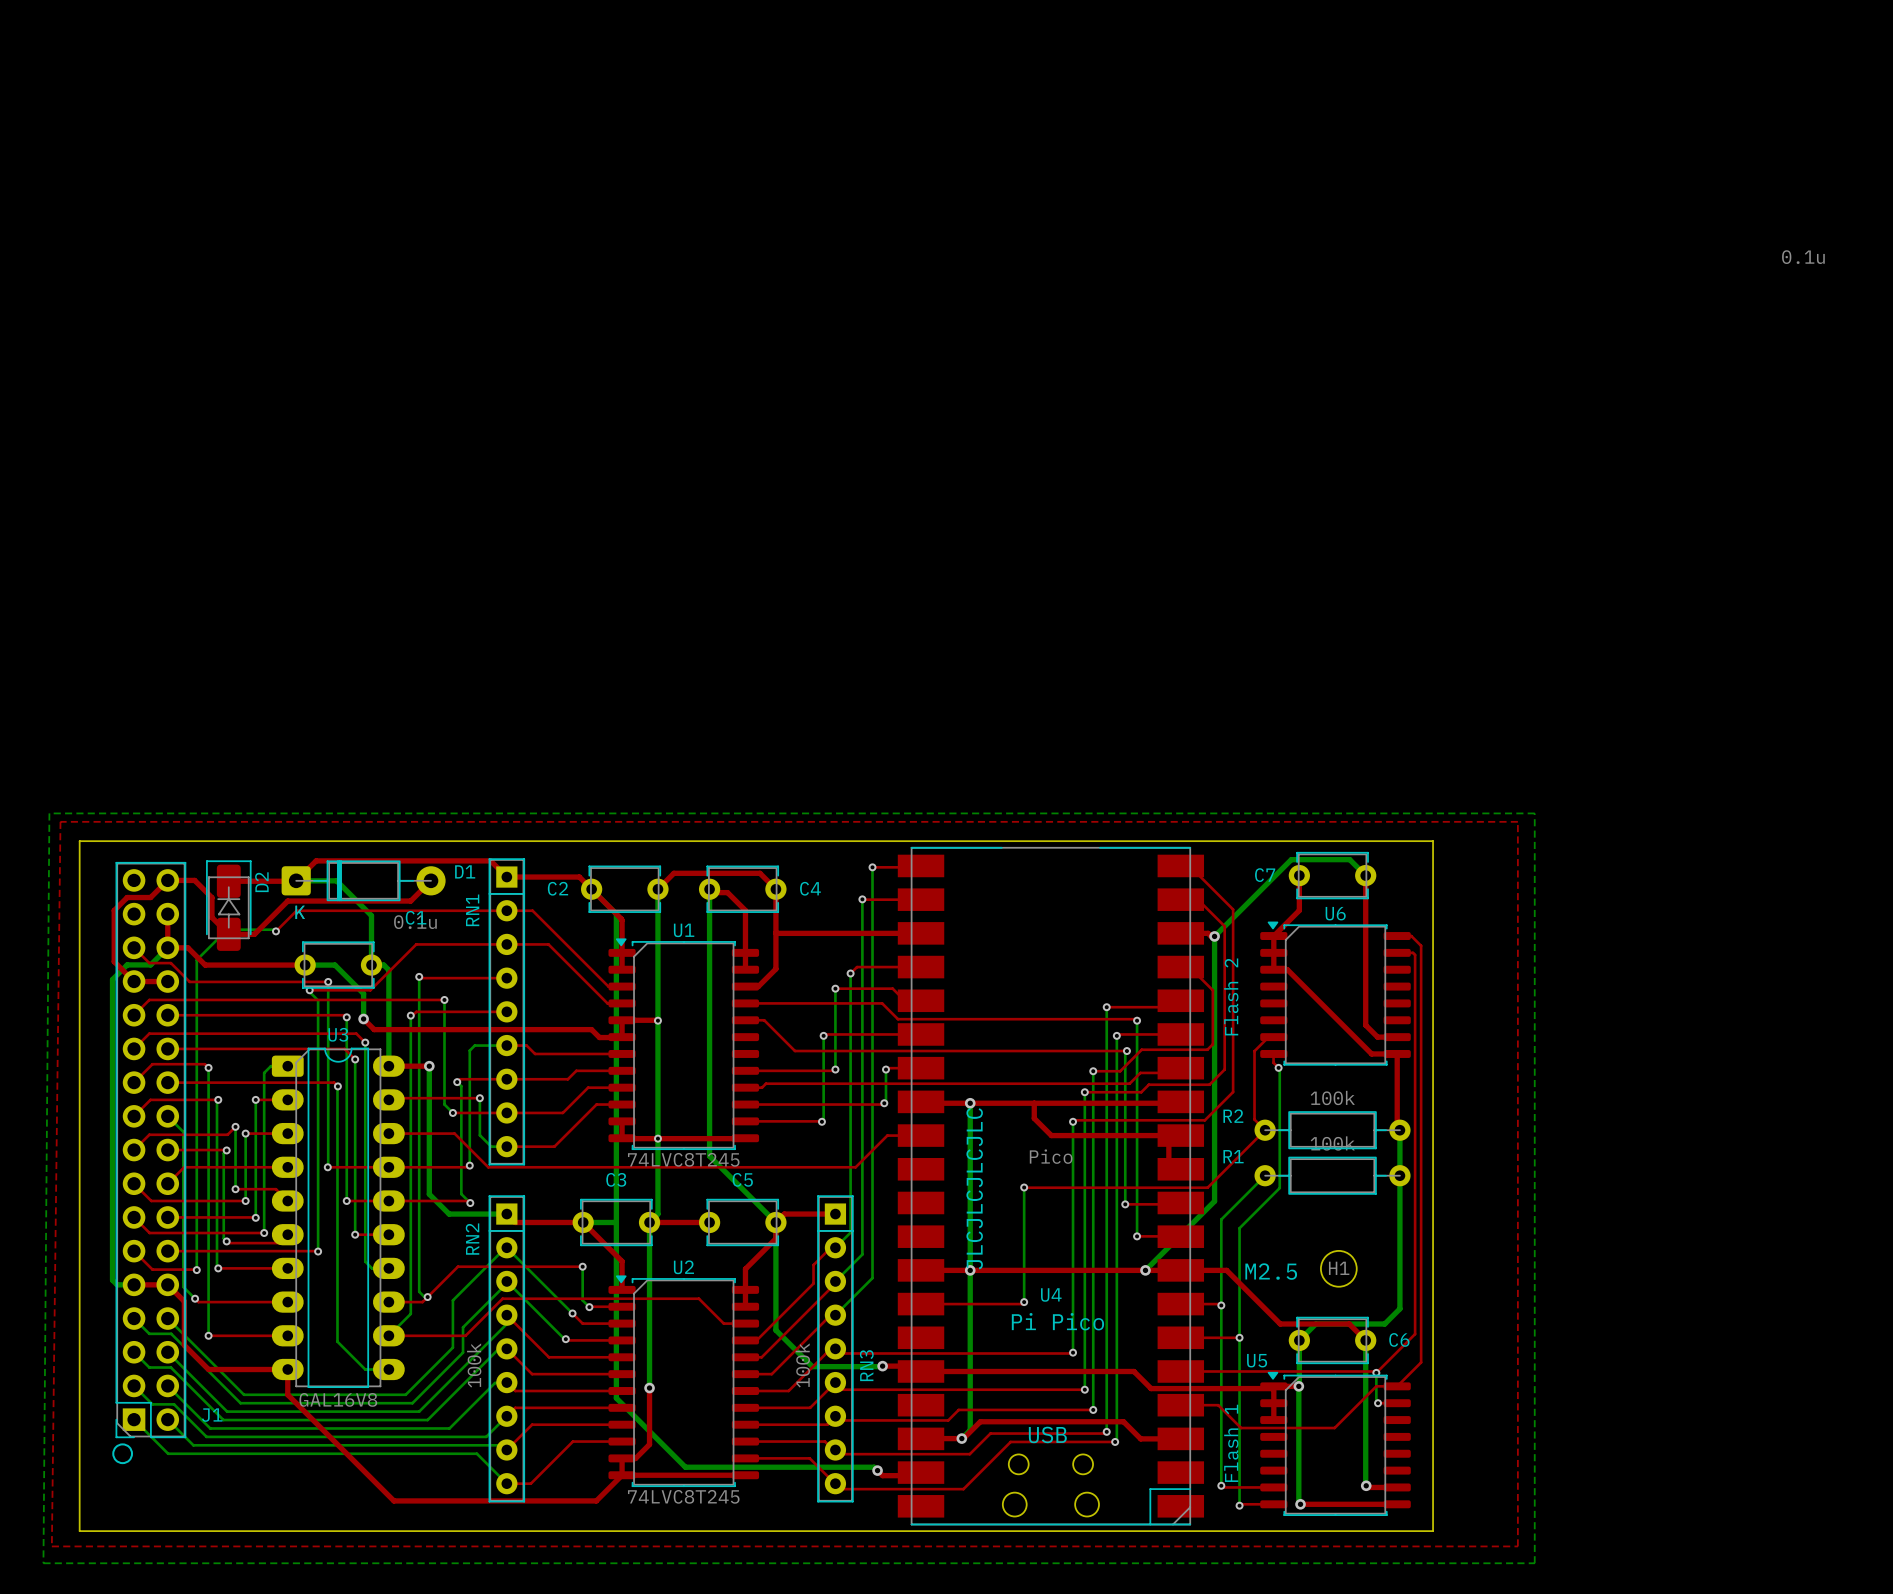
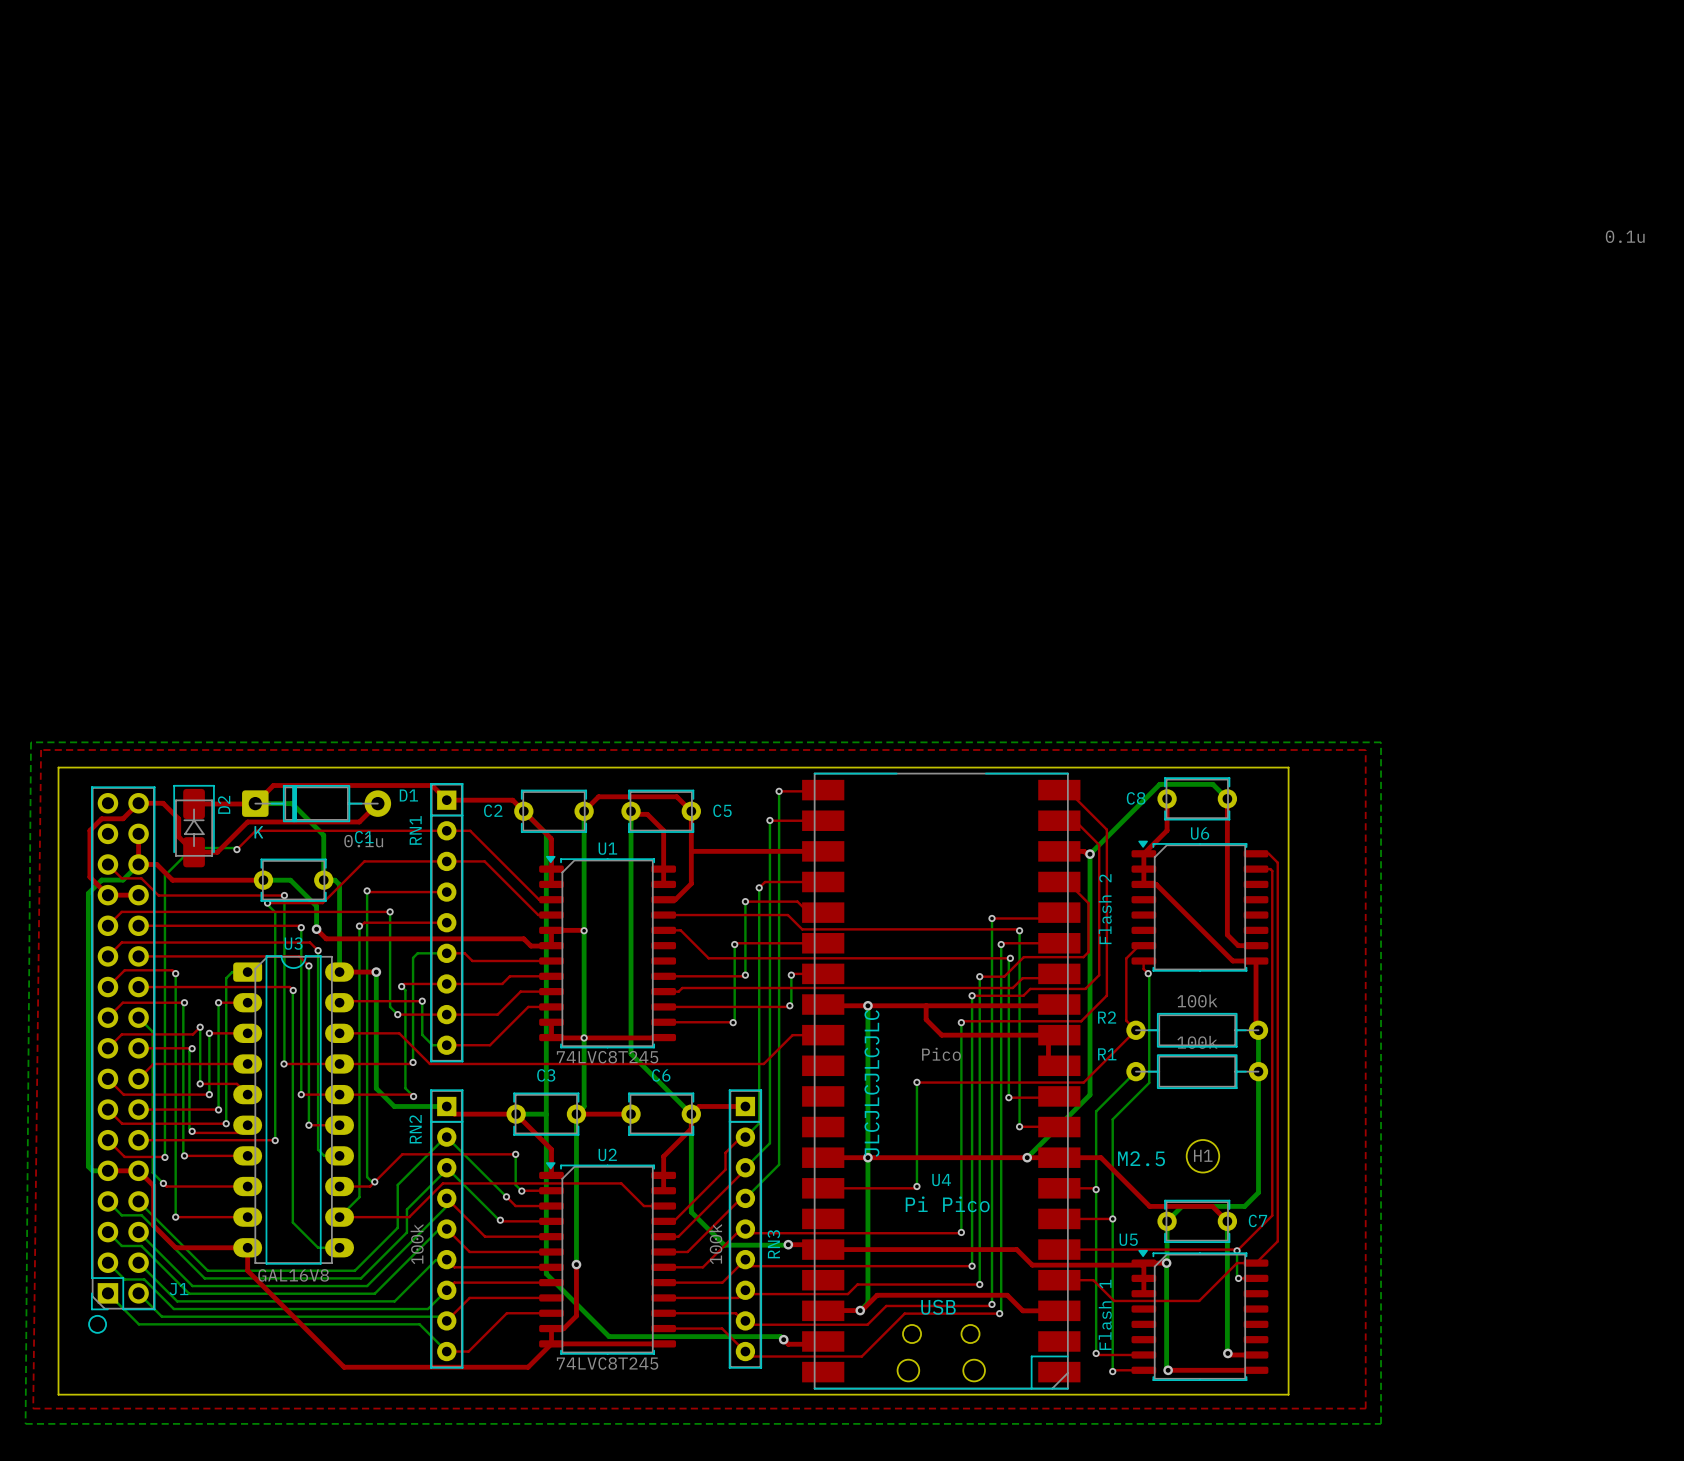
C7 name: C7 (1265, 875) -> C8 (1136, 798)
C4 name: C4 (810, 888) -> C5 (722, 810)
C5 name: C5 (742, 1179) -> C6 (661, 1075)
C6 name: C6 (1399, 1339) -> C7 (1257, 1220)

